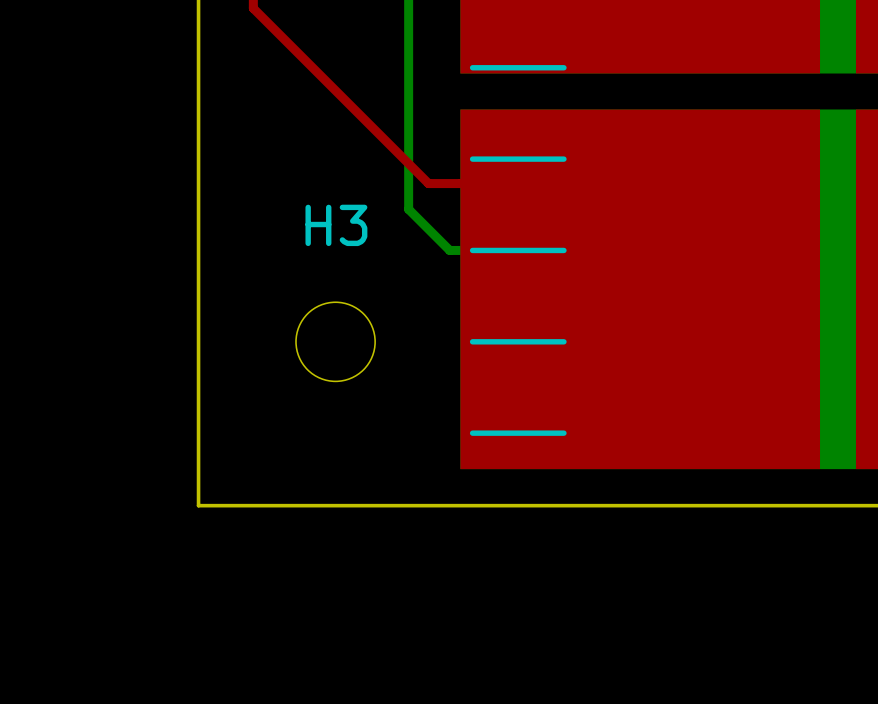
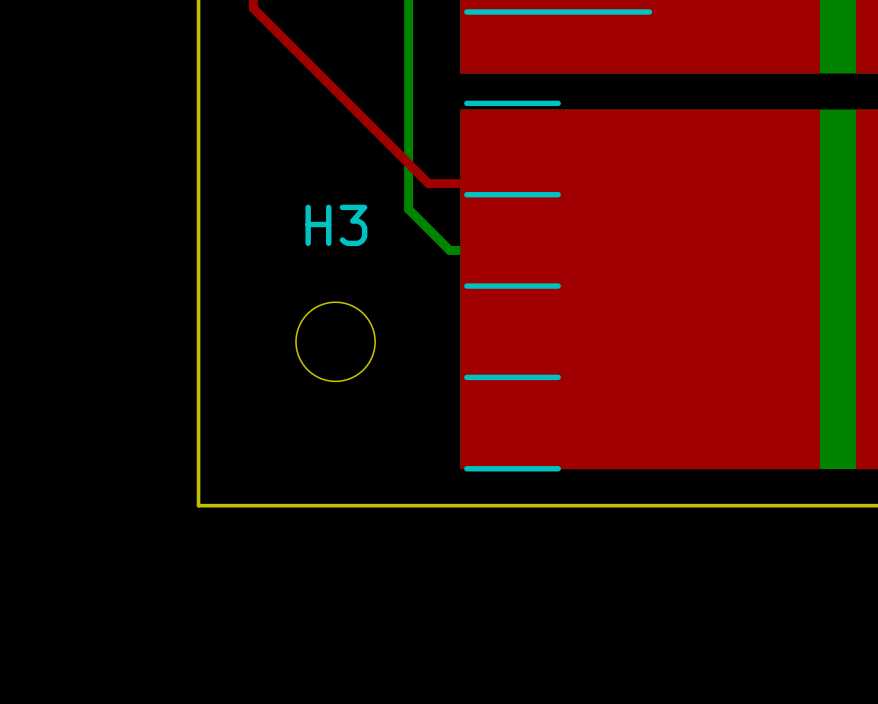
line: none -> (466, 12) (649, 12)
line: (472, 67) (563, 67) -> (466, 103) (558, 103)
line: (472, 159) (563, 159) -> (466, 194) (558, 194)
line: (472, 250) (563, 250) -> (466, 286) (558, 286)
line: (472, 341) (563, 341) -> (466, 377) (558, 377)
line: (472, 433) (563, 433) -> (466, 468) (558, 468)

